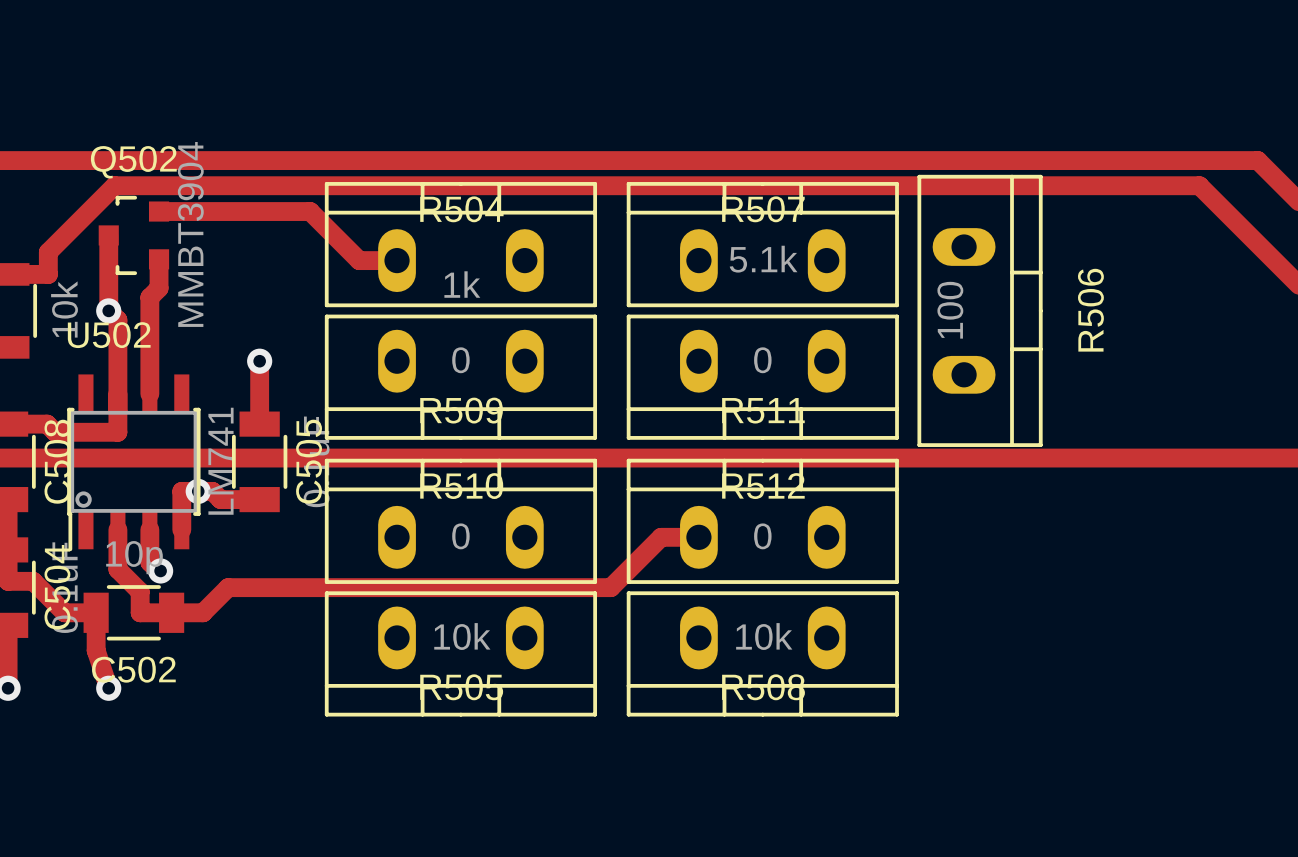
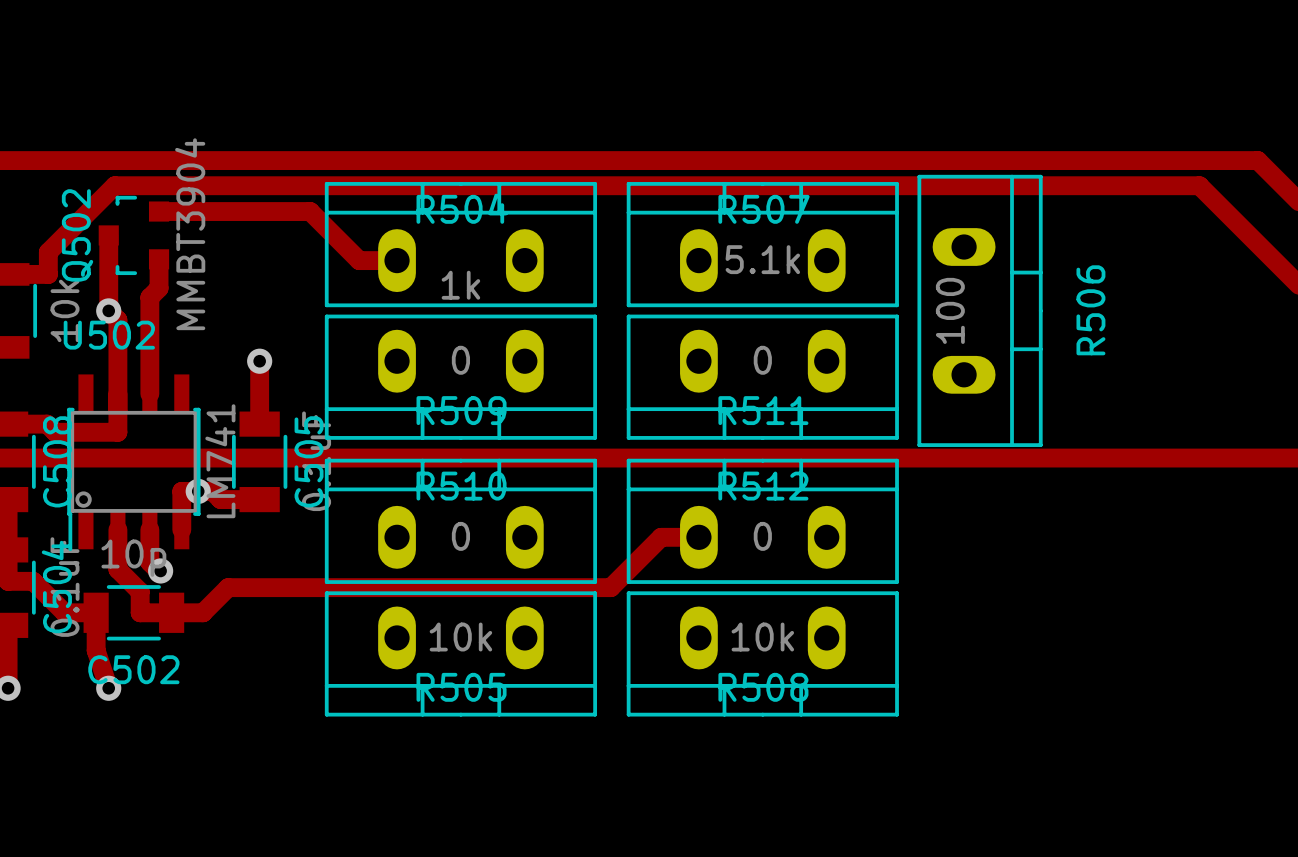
Q502 name rotation: 0° (133, 162) -> 90° counterclockwise (77, 235)

